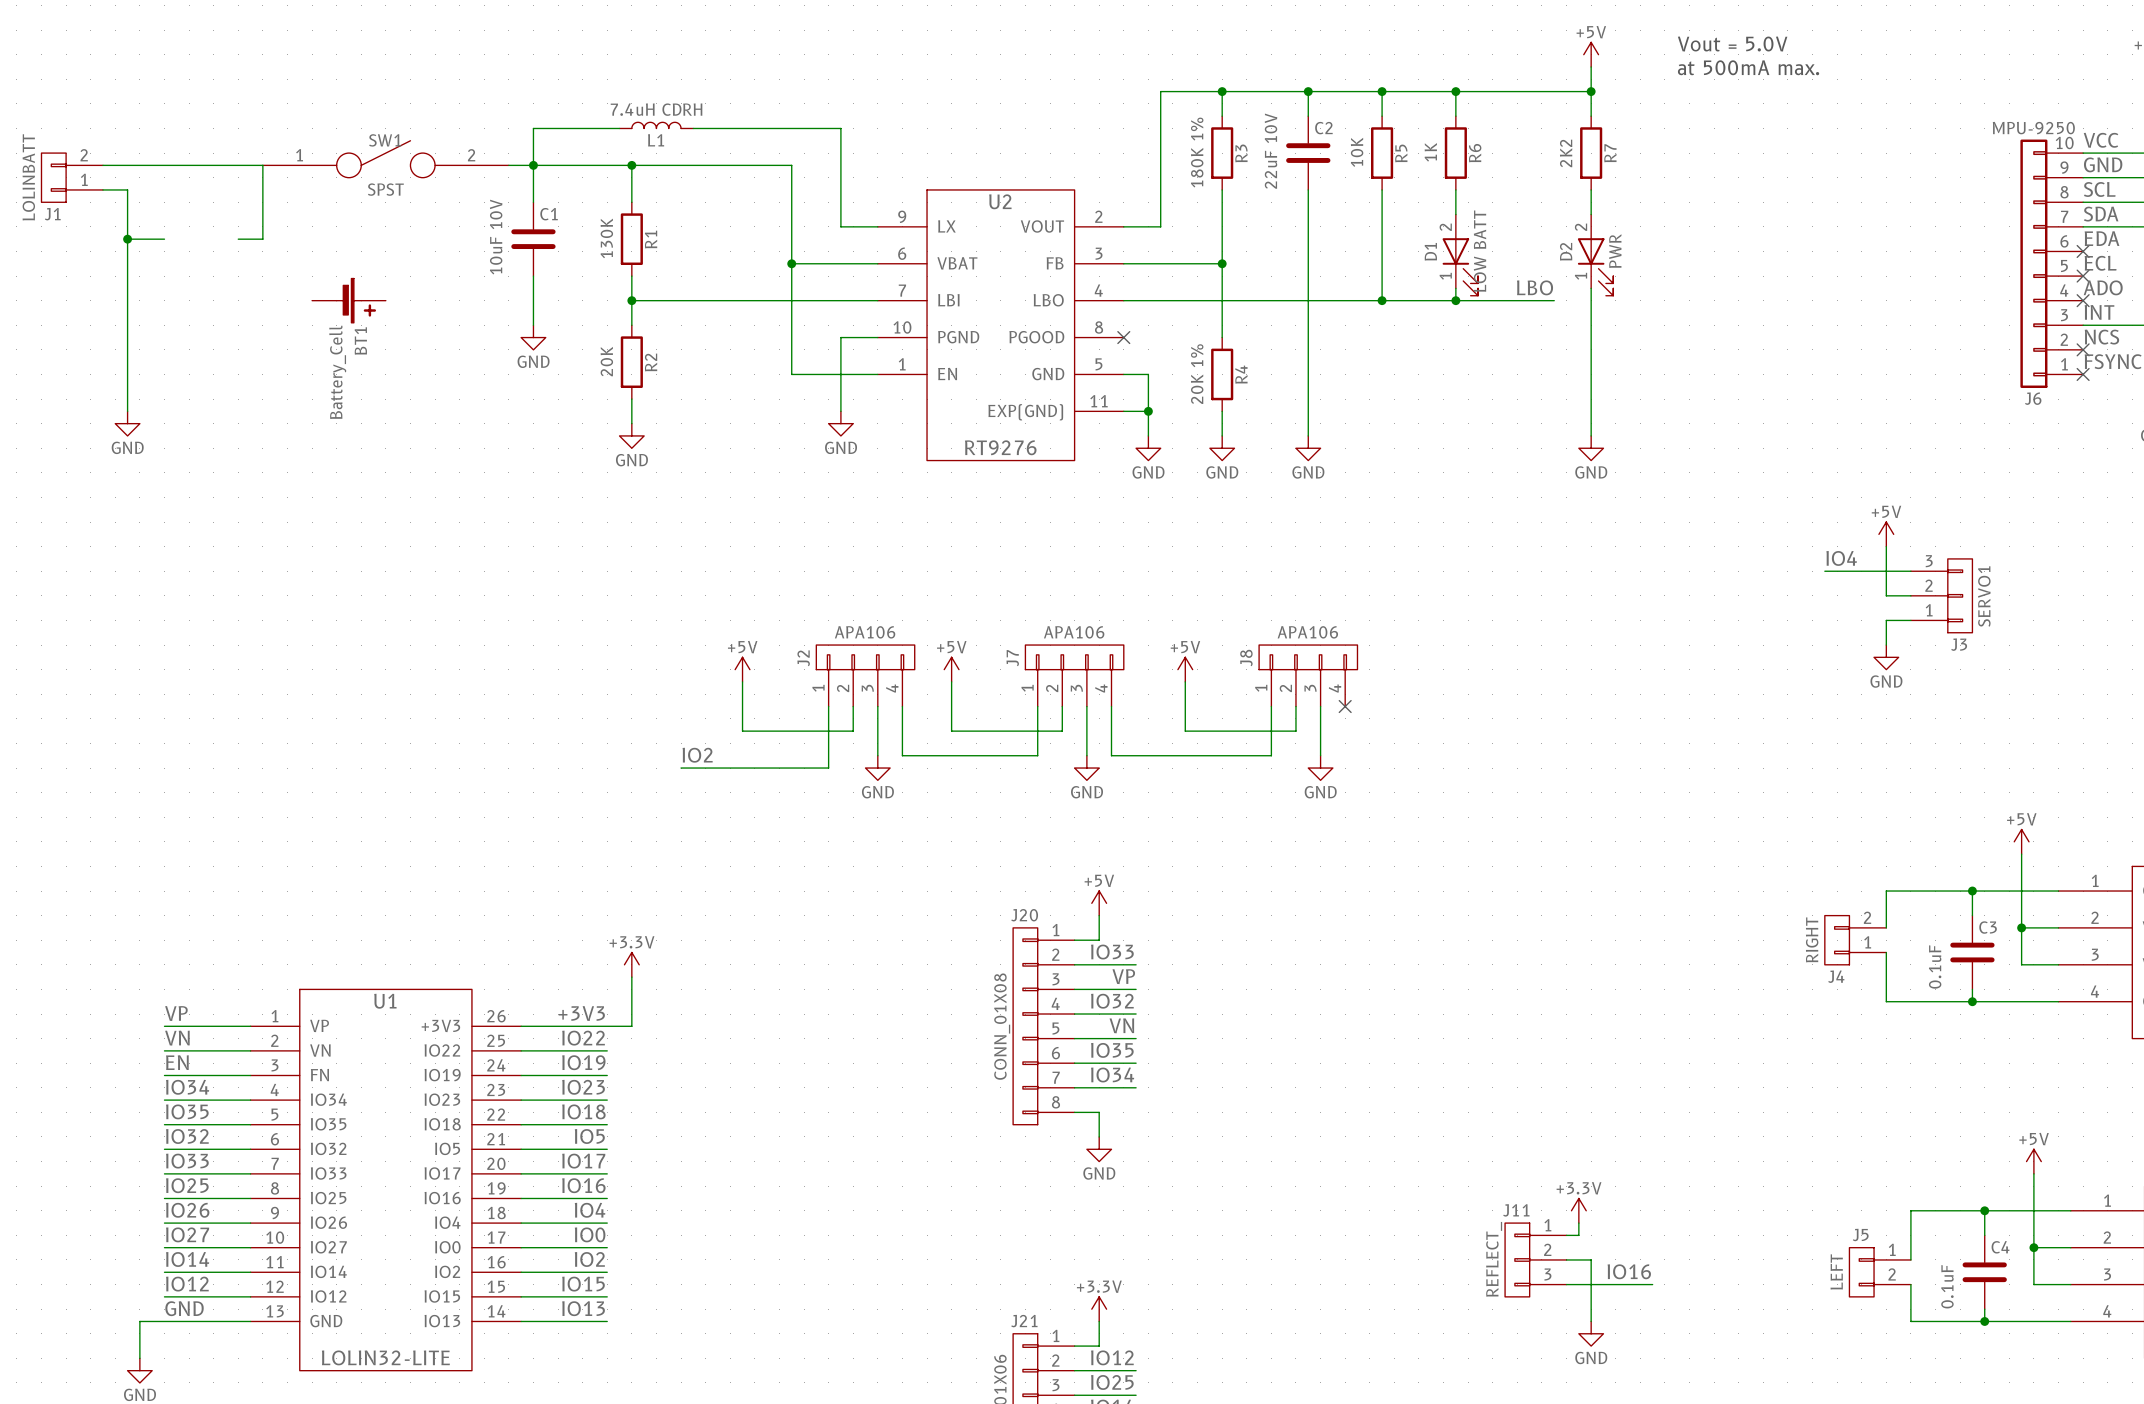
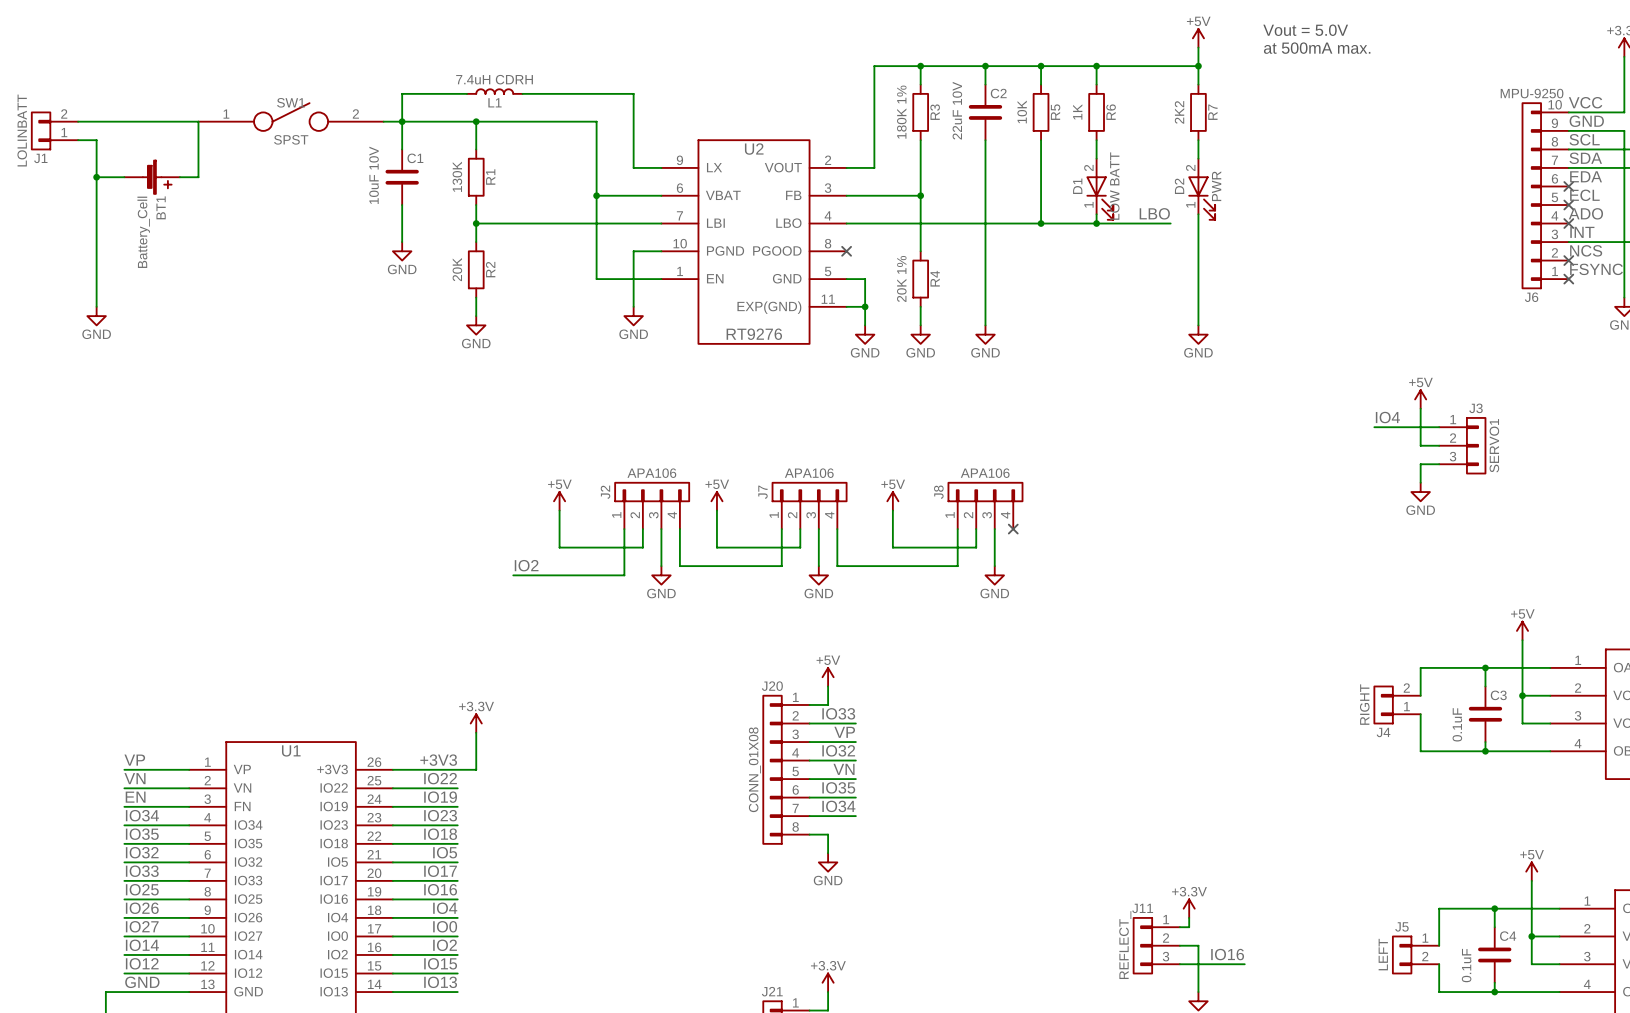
BT1 position: (348, 300) -> (152, 177)
J3 flip: as is (1960, 595) -> up-down (1476, 445)

